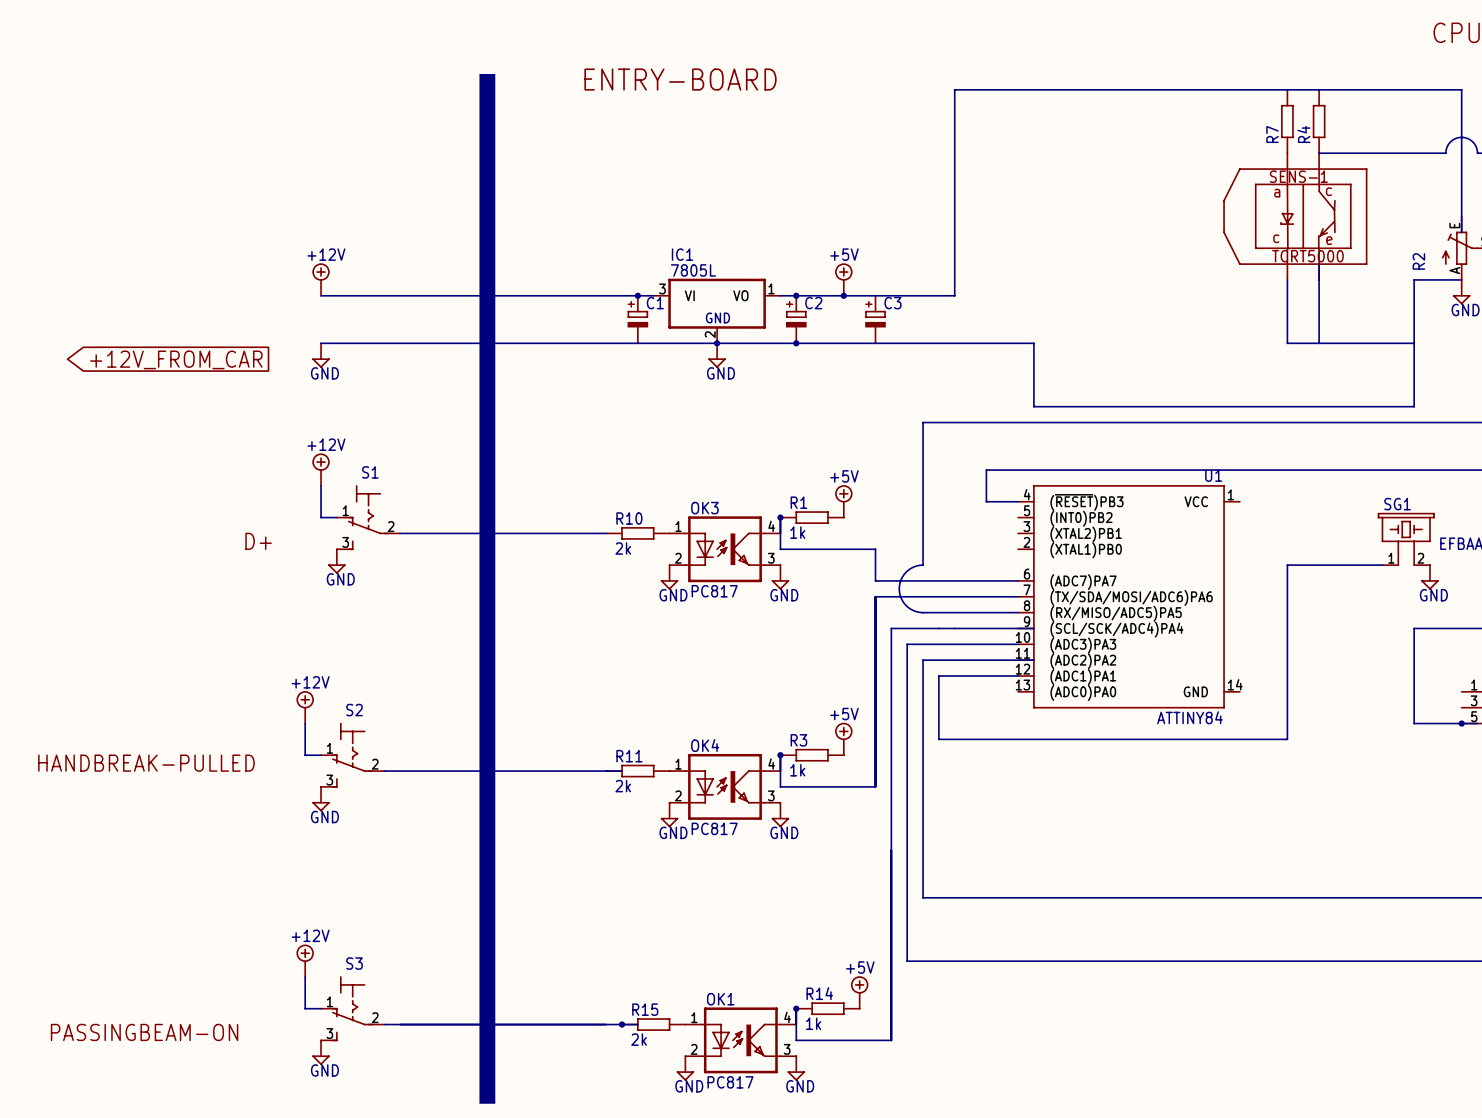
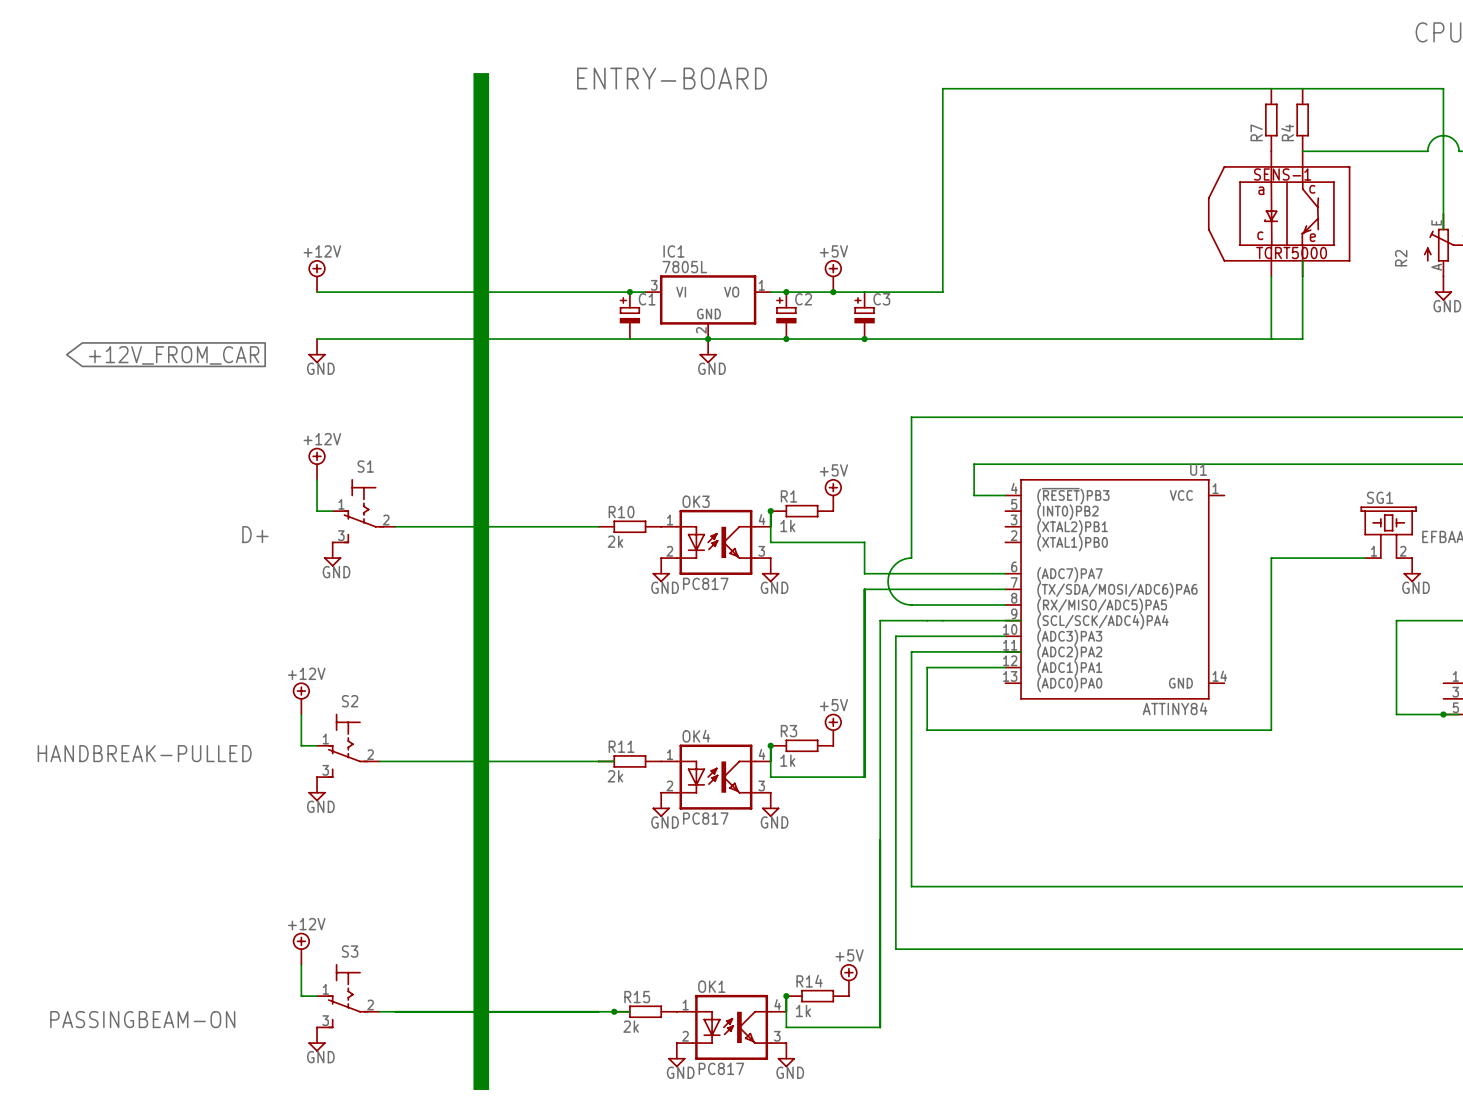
wire: (1461, 279) (1414, 279) (1414, 406) (1033, 406) (1033, 343) -> (1271, 339) (1021, 339)
junction: none -> (864, 339)
wire: (1319, 343) (1414, 343) -> none

